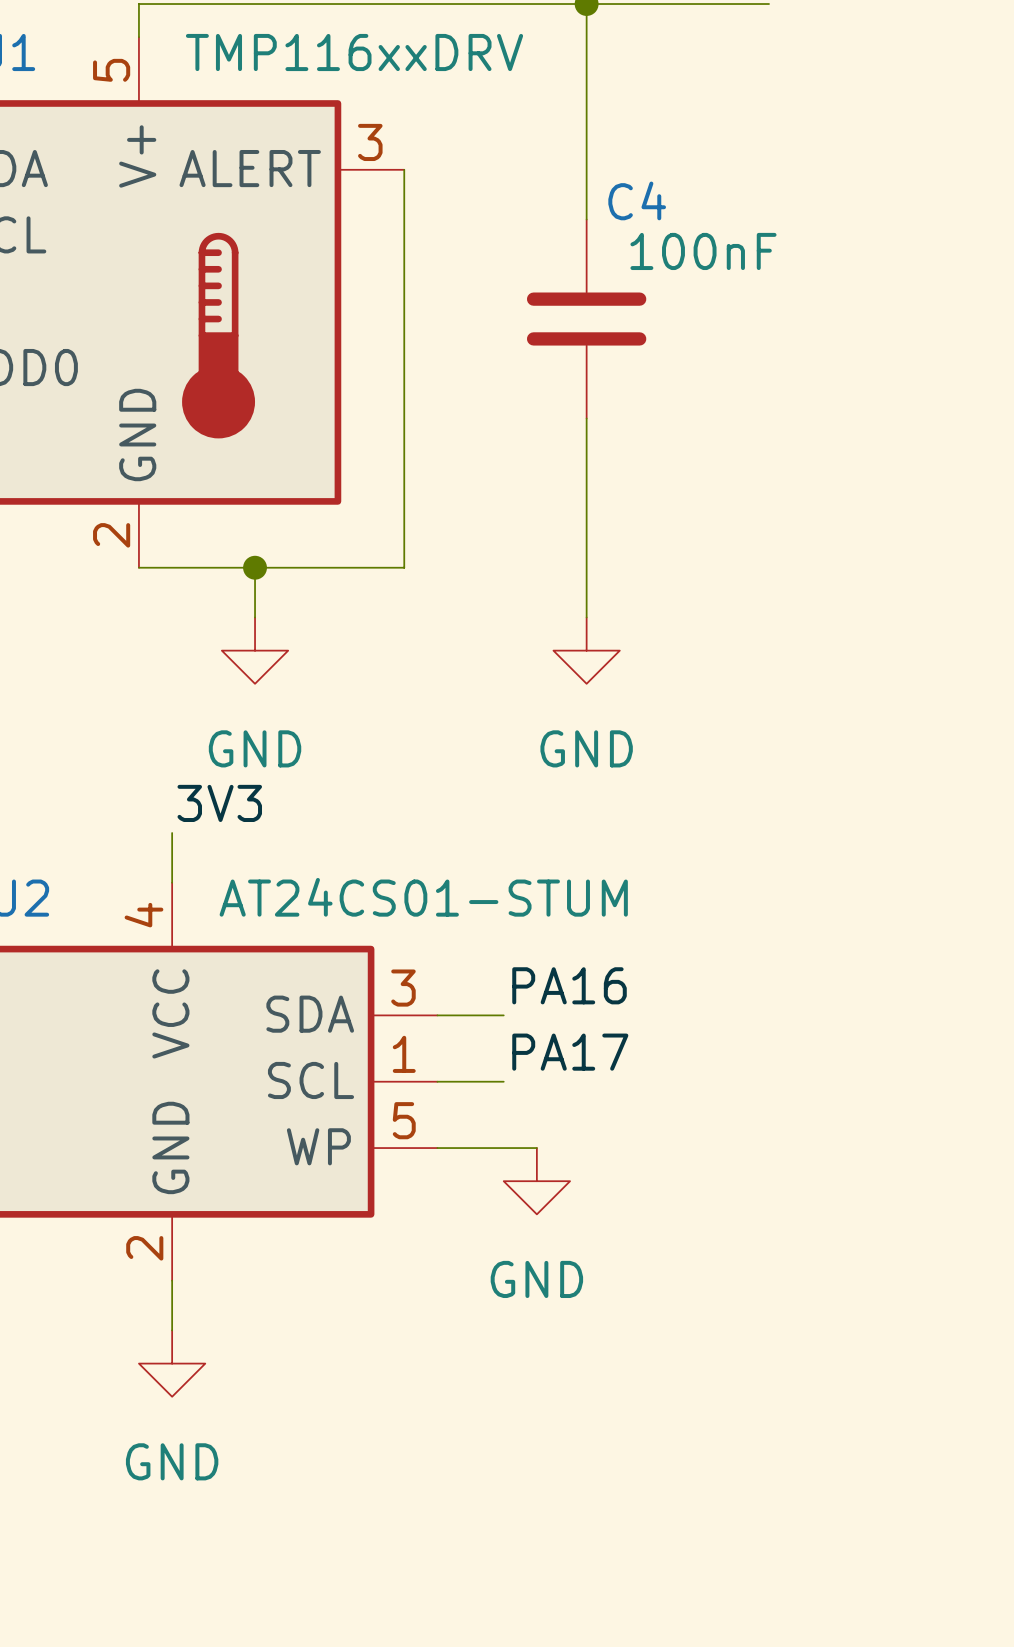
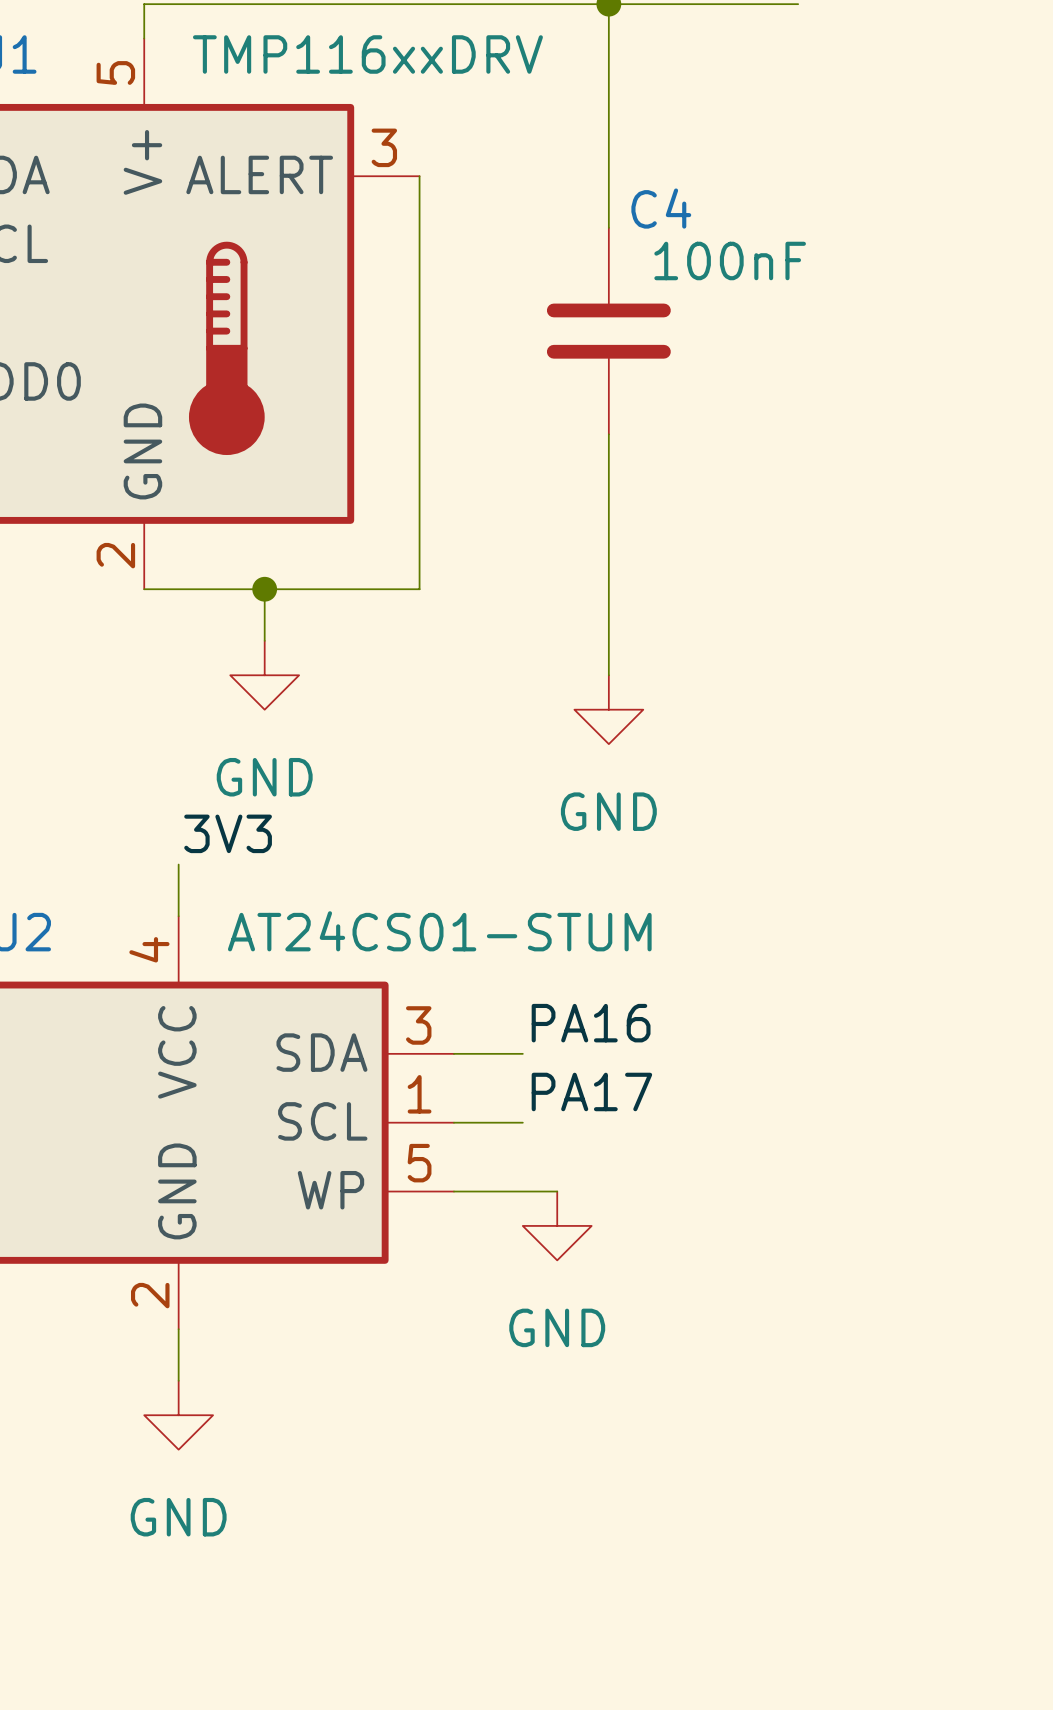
power symbol position: GND (586, 650) -> GND (608, 709)

